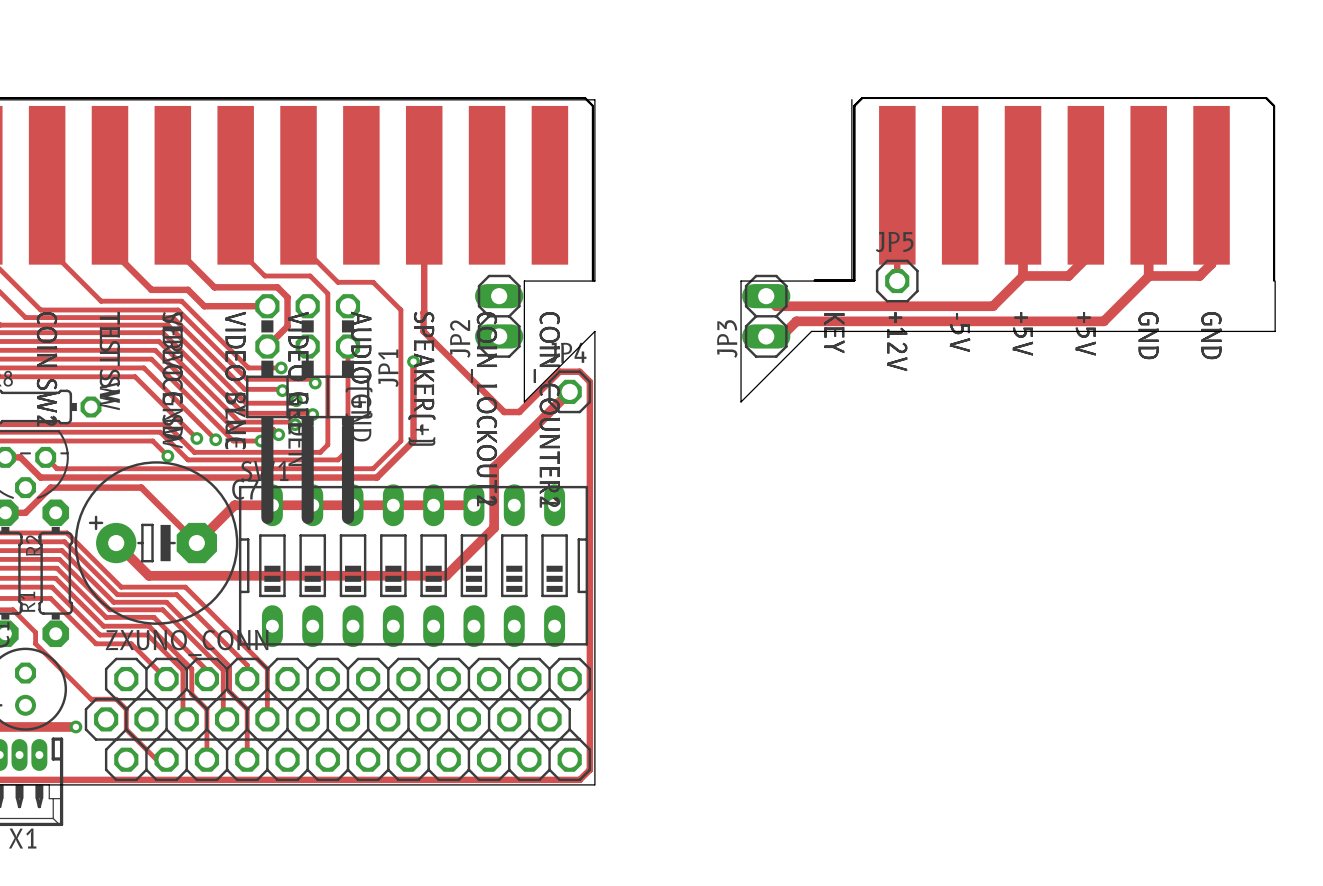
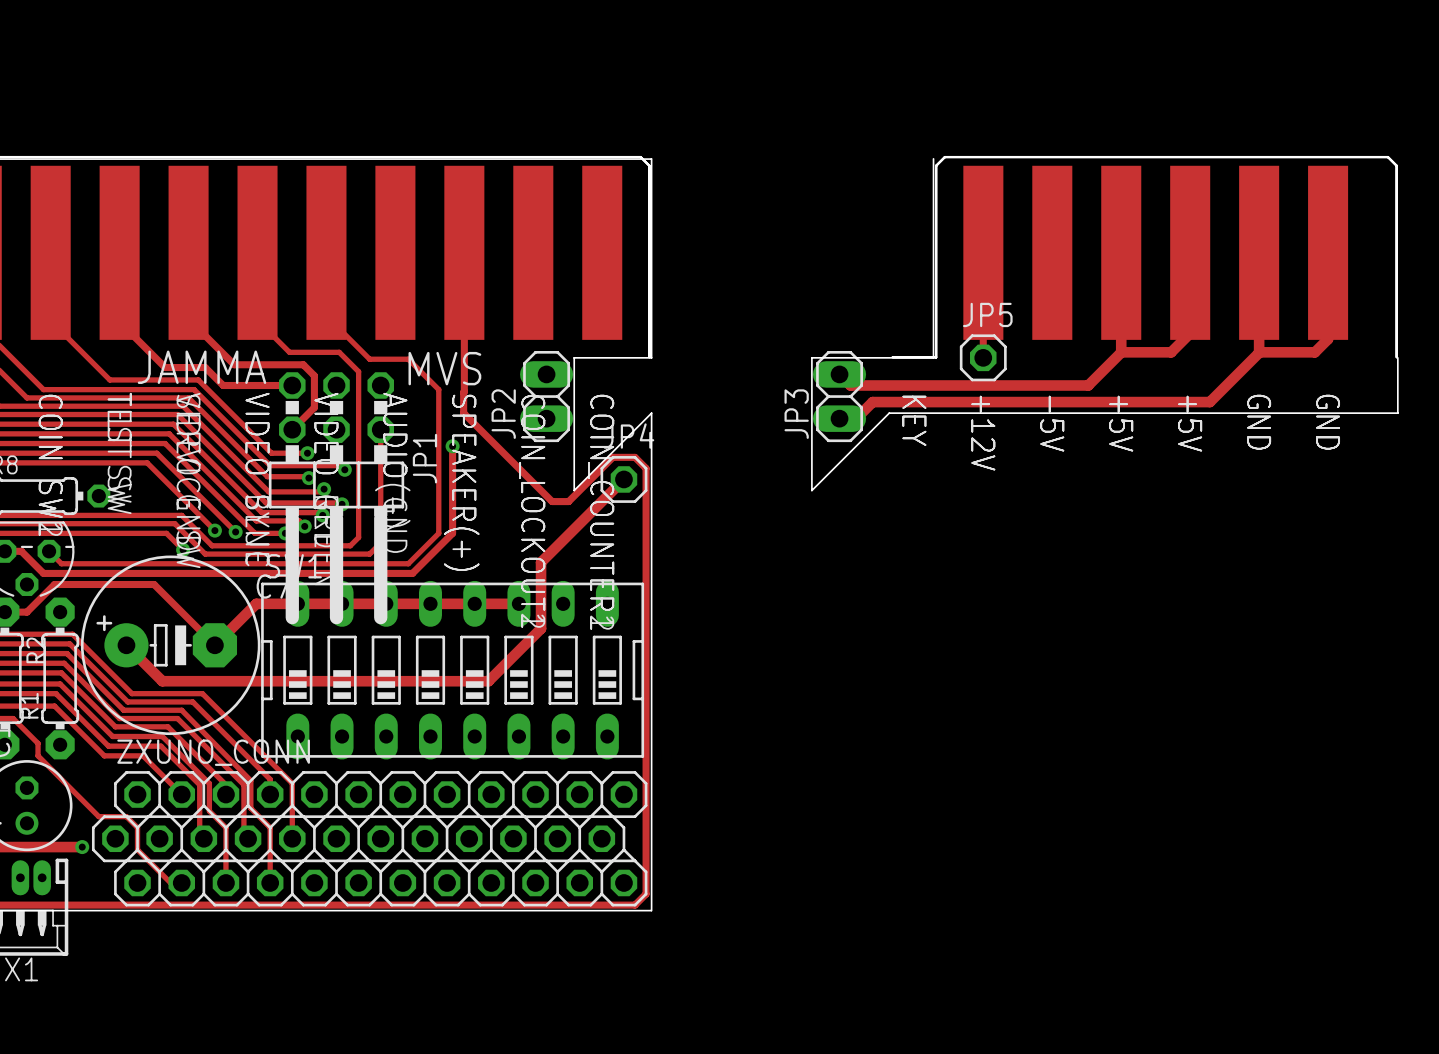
text: none -> JAMMA (202, 367)
text: none -> MVS (444, 368)

